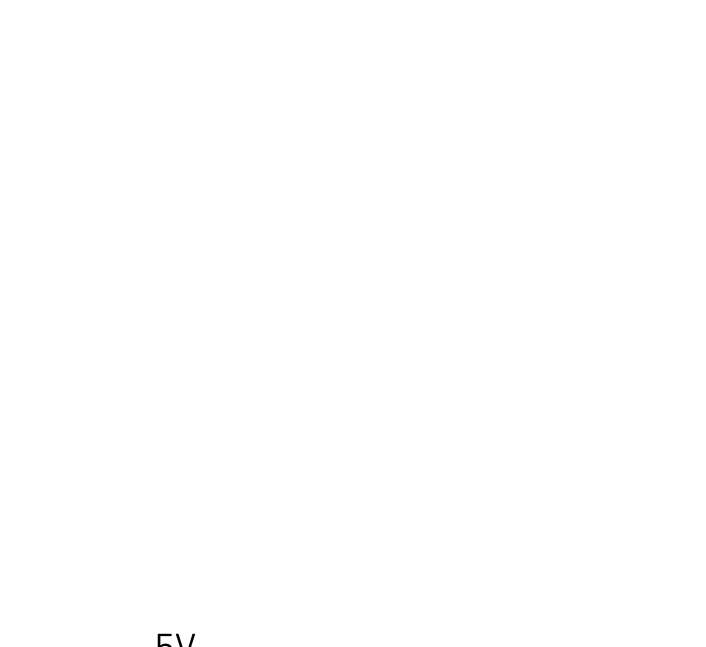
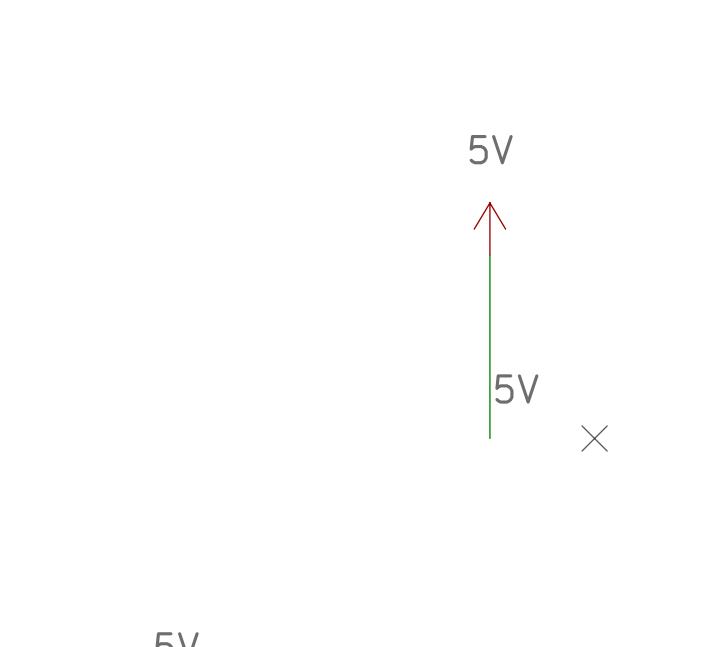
power symbol: none -> 5V (489, 229)
wire: none -> (489, 255) (489, 438)
label: none -> 5V (516, 388)
no-connect mark: none -> (594, 438)

